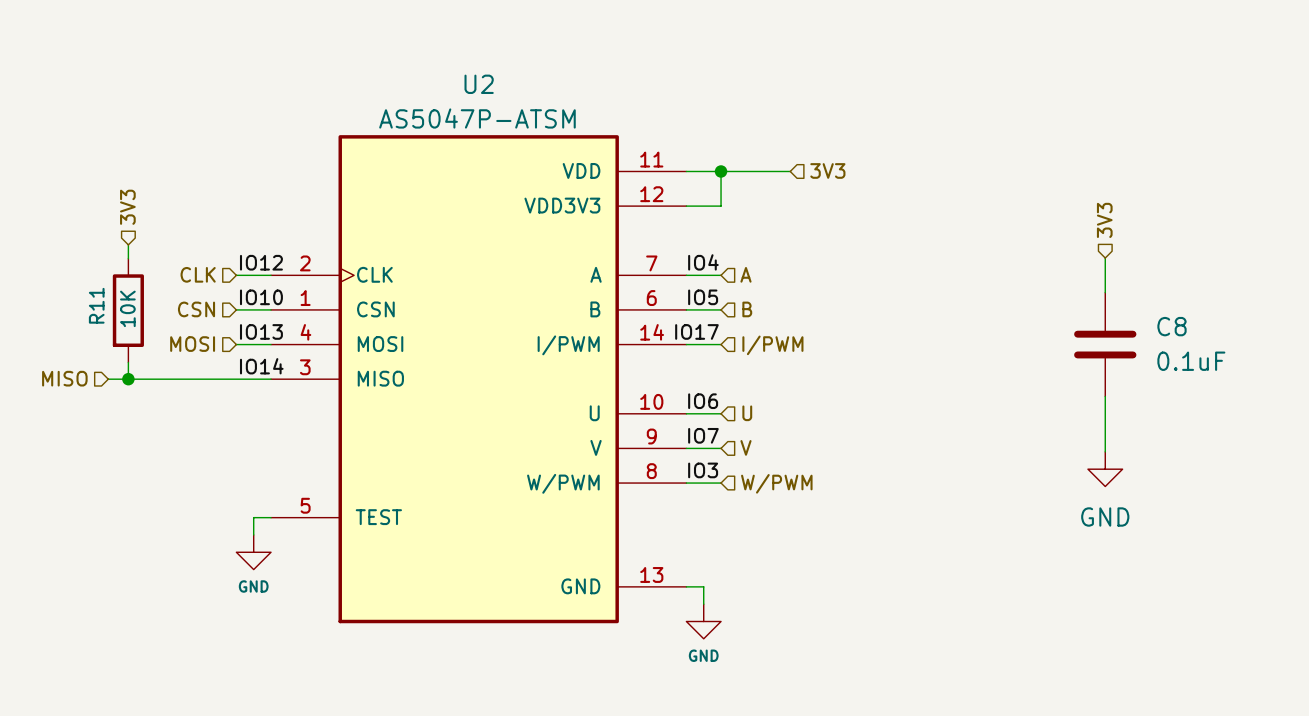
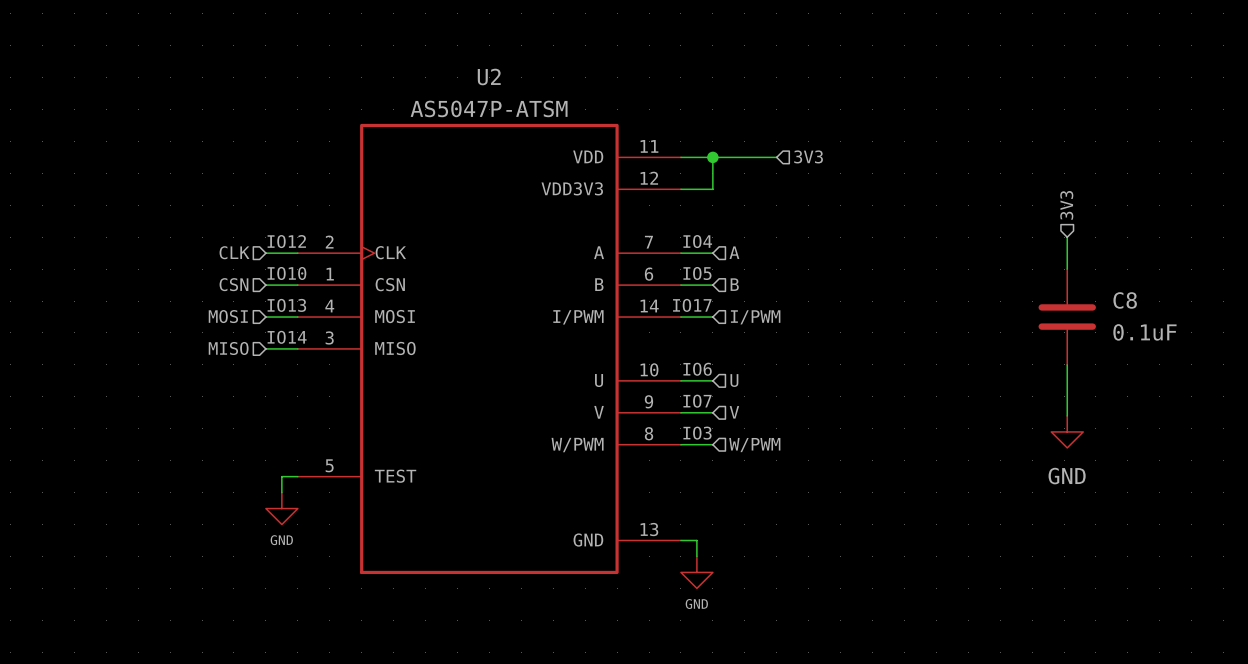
hierarchical label: 3V3 (127, 207) -> none
wire: (128, 244) (128, 258) -> none
R11: 10K (128, 310) -> none
wire: (128, 362) (128, 379) -> none
hierarchical label position: MISO (64, 378) -> MISO (228, 348)
wire: (108, 379) (236, 379) -> none
junction: (128, 379) -> none

